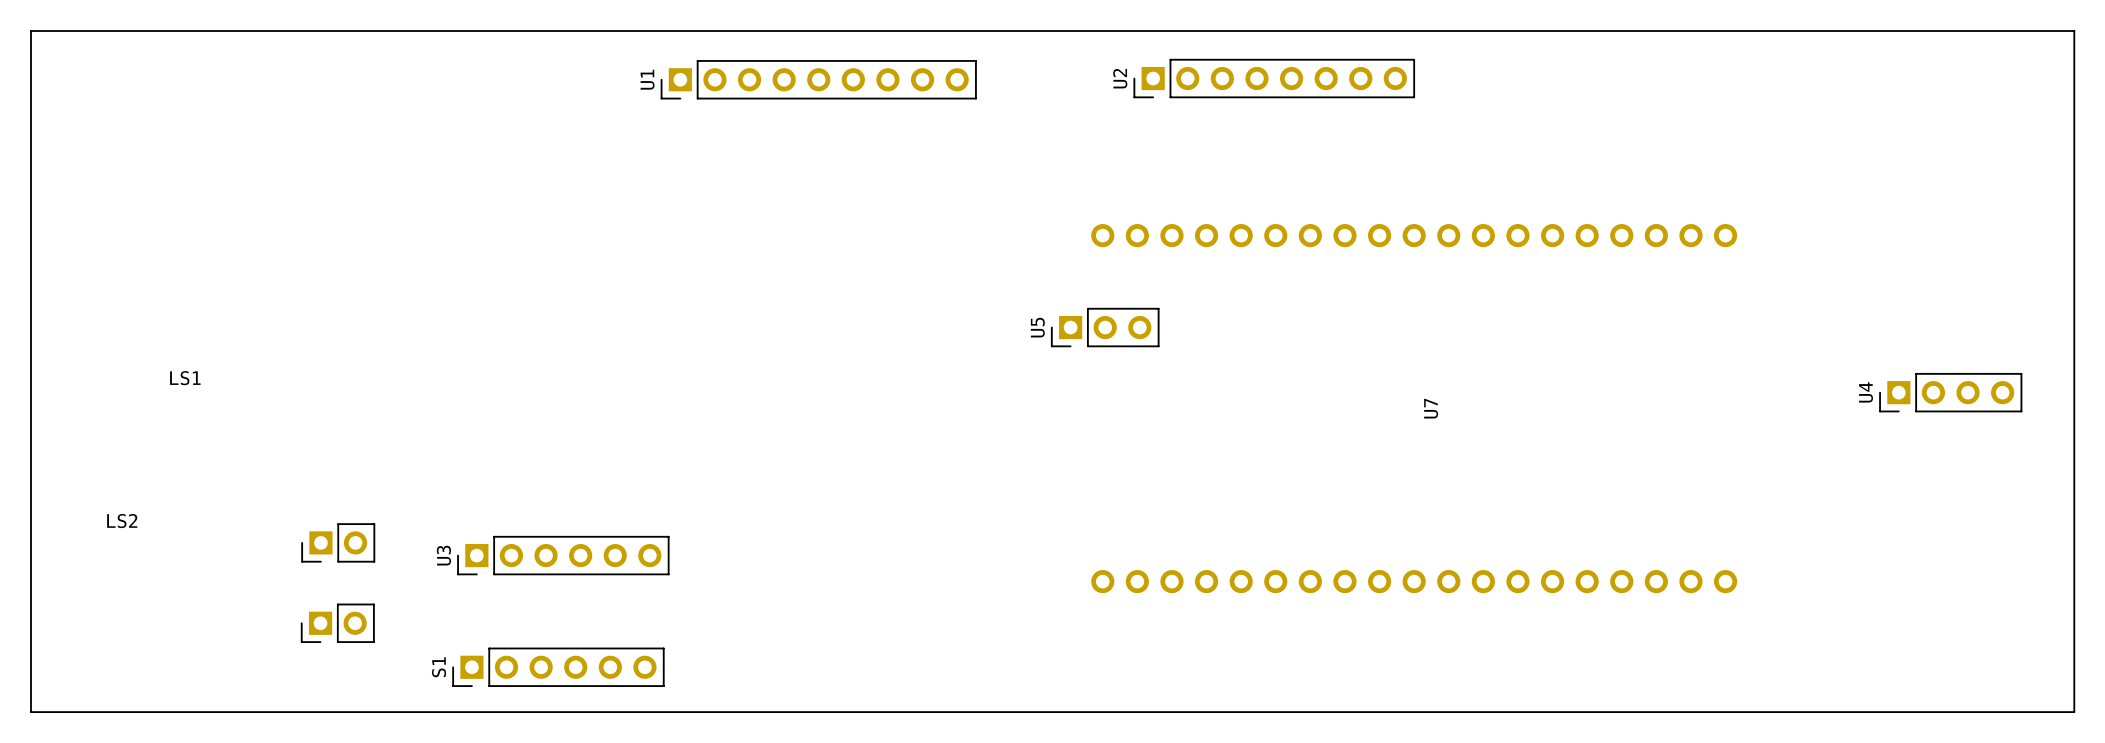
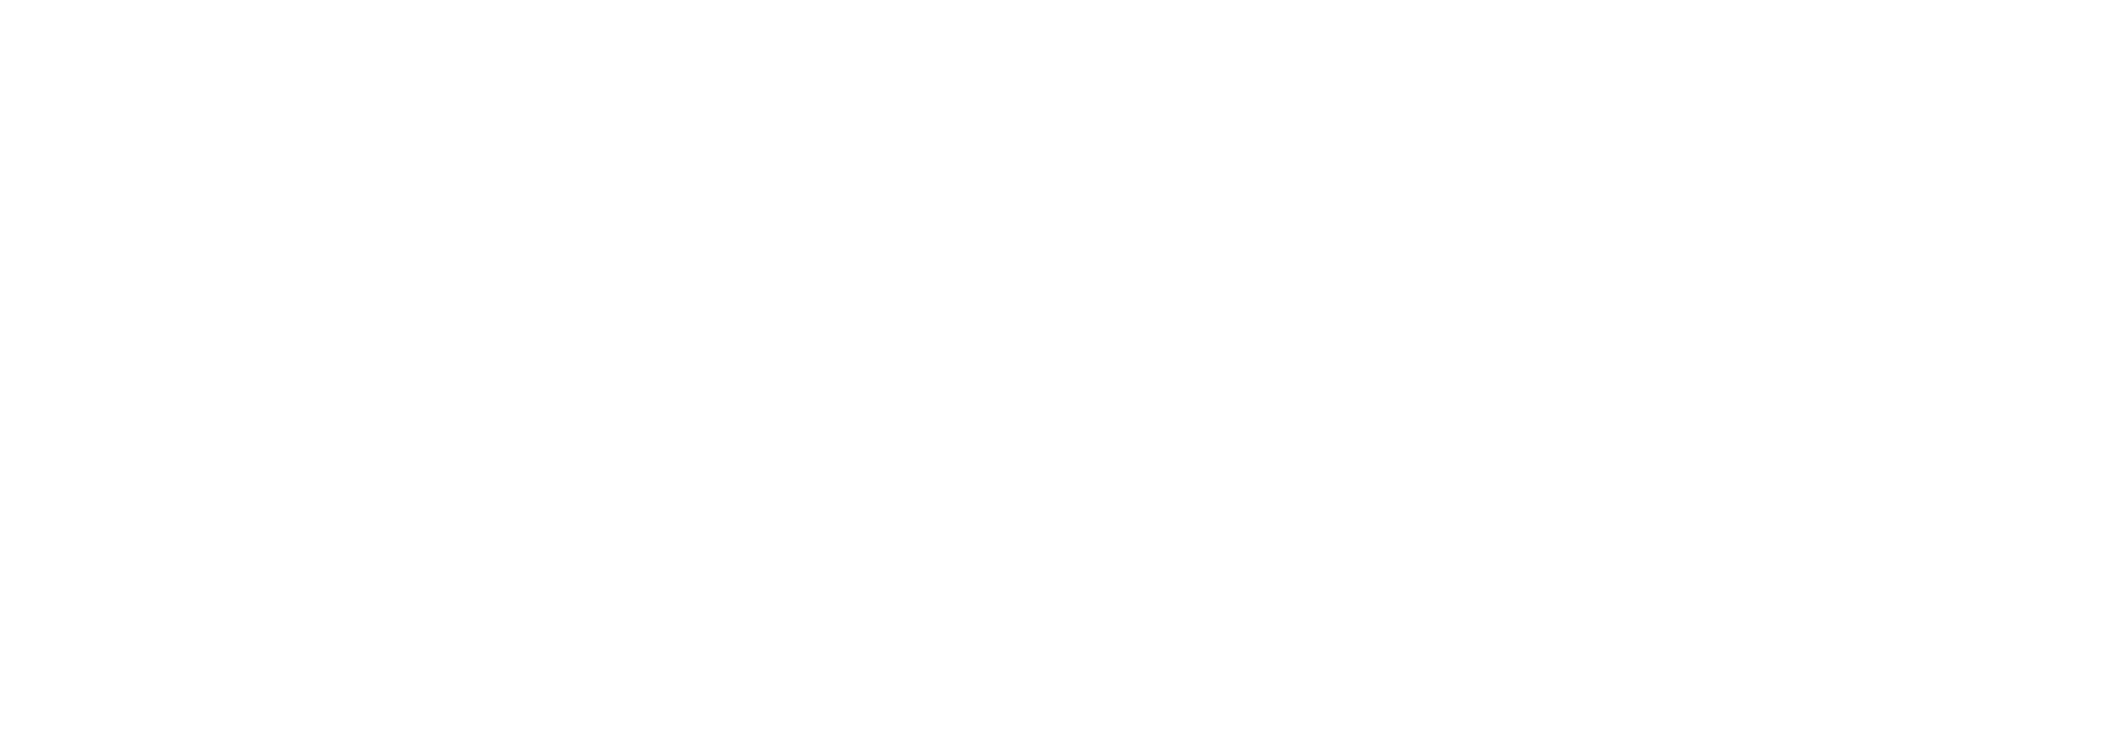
board edge: (30, 30) (2074, 30) (2074, 712) (30, 712) (30, 30) -> none
U2: (1274, 78) -> none
U1: (818, 79) -> none
U5: (1105, 327) -> none
U4: (1950, 392) -> none
U7: (1414, 408) -> none
LS1: (338, 542) -> none
U3: (563, 555) -> none
LS2: (337, 623) -> none
S1: (558, 667) -> none

